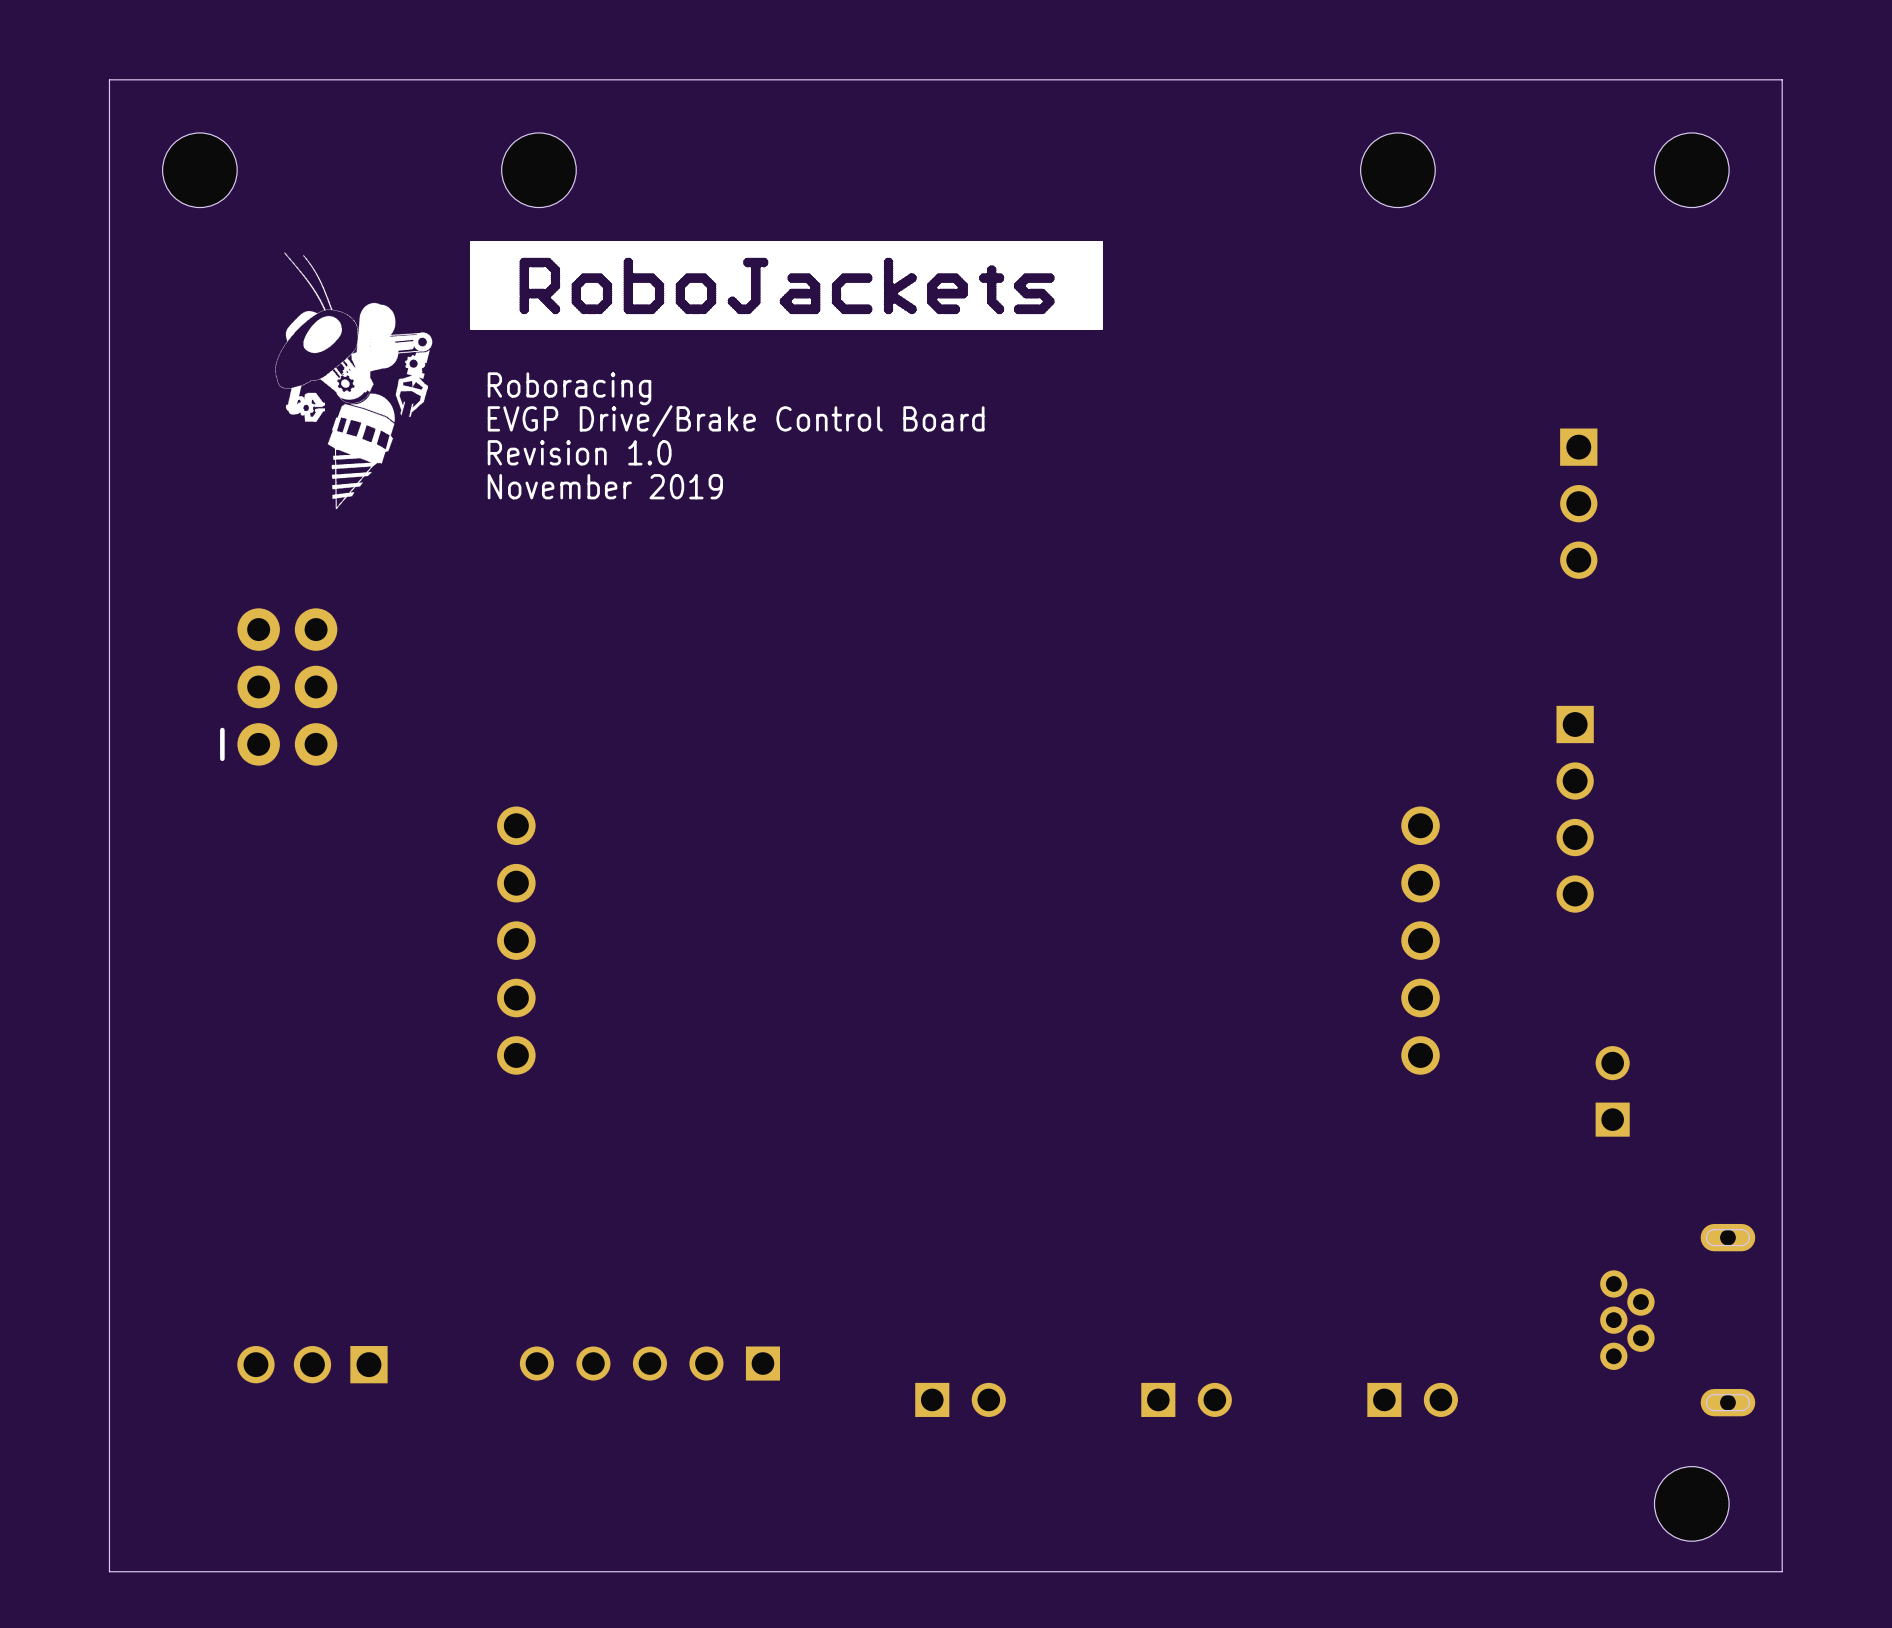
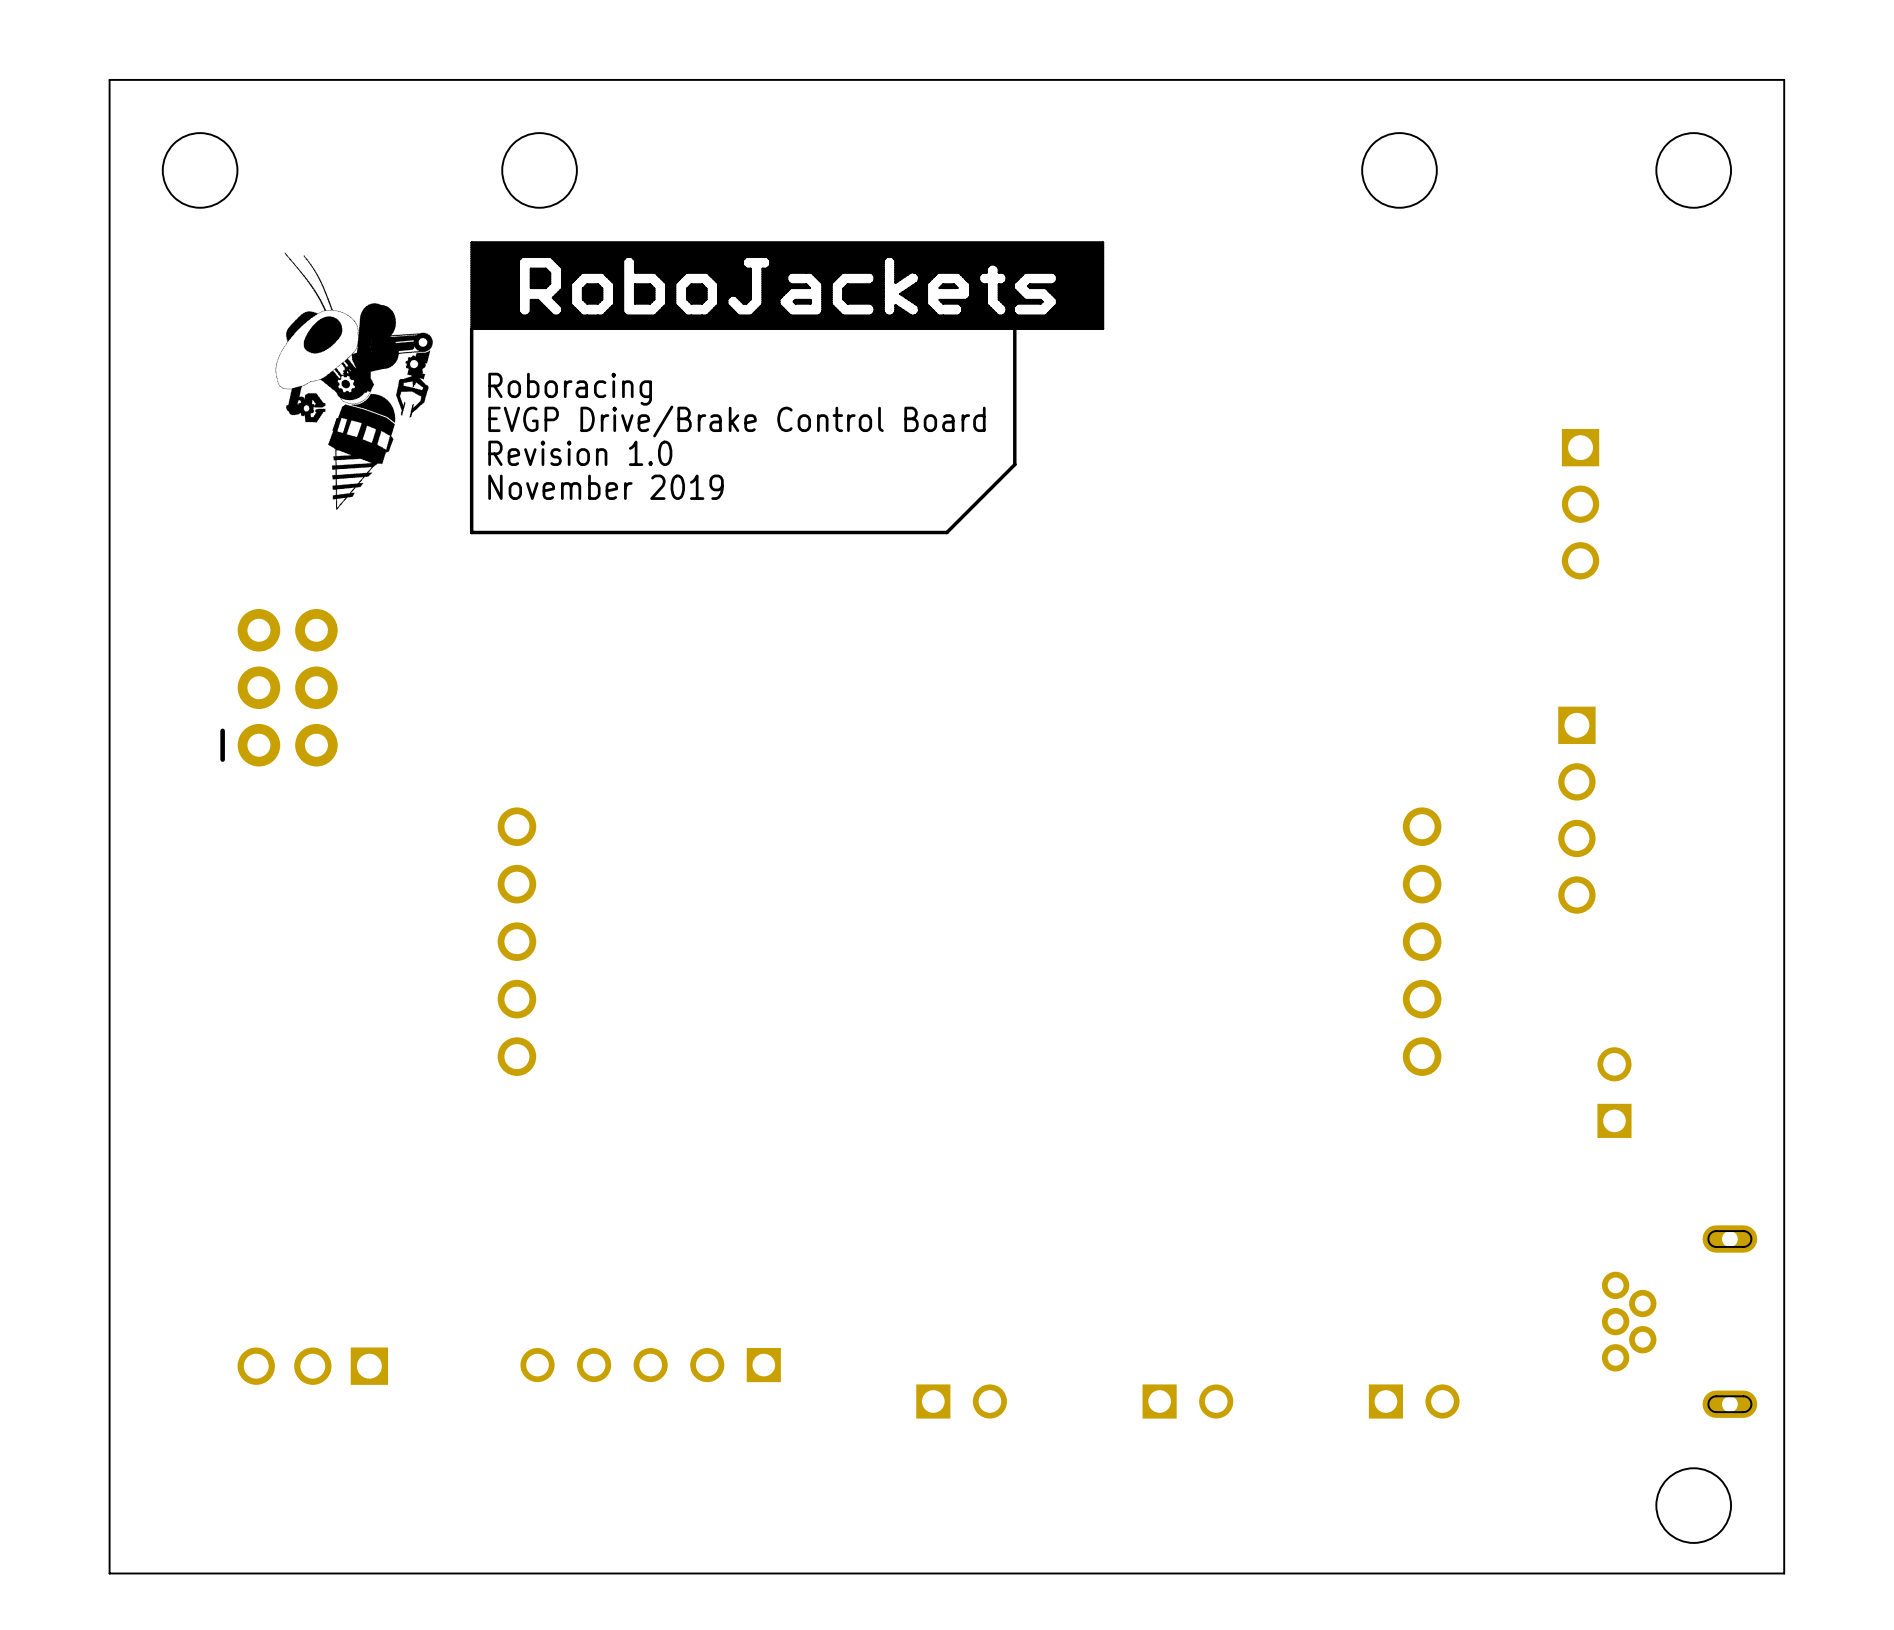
line: none -> (1014, 328) (1014, 464) (946, 532) (471, 532) (471, 328)

